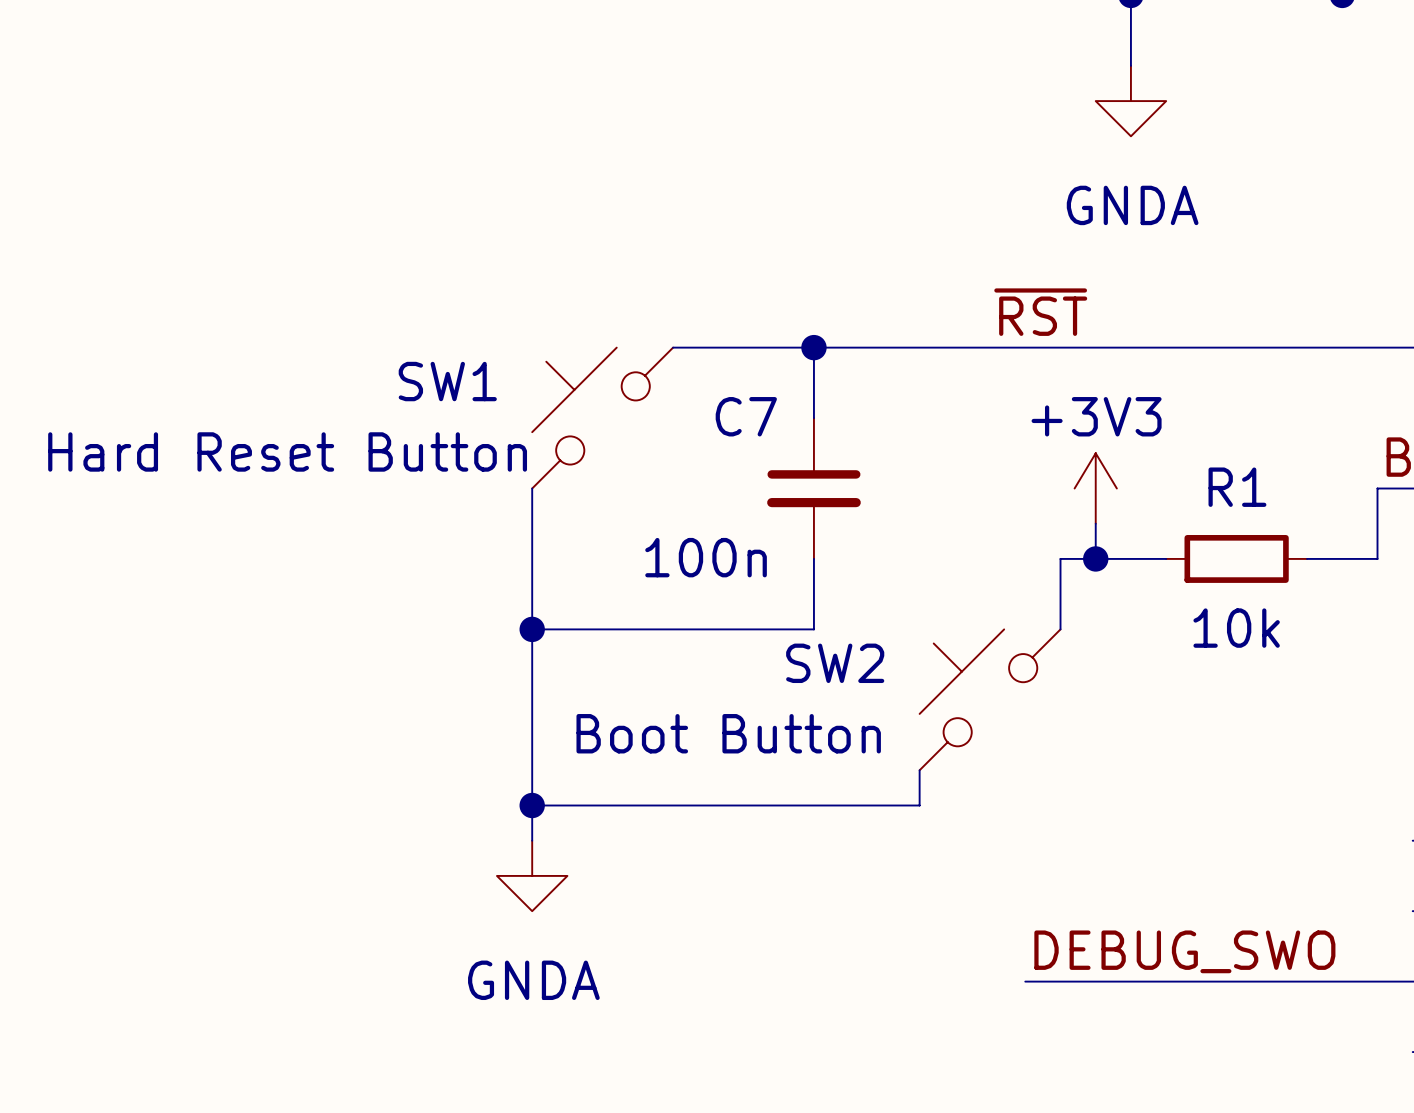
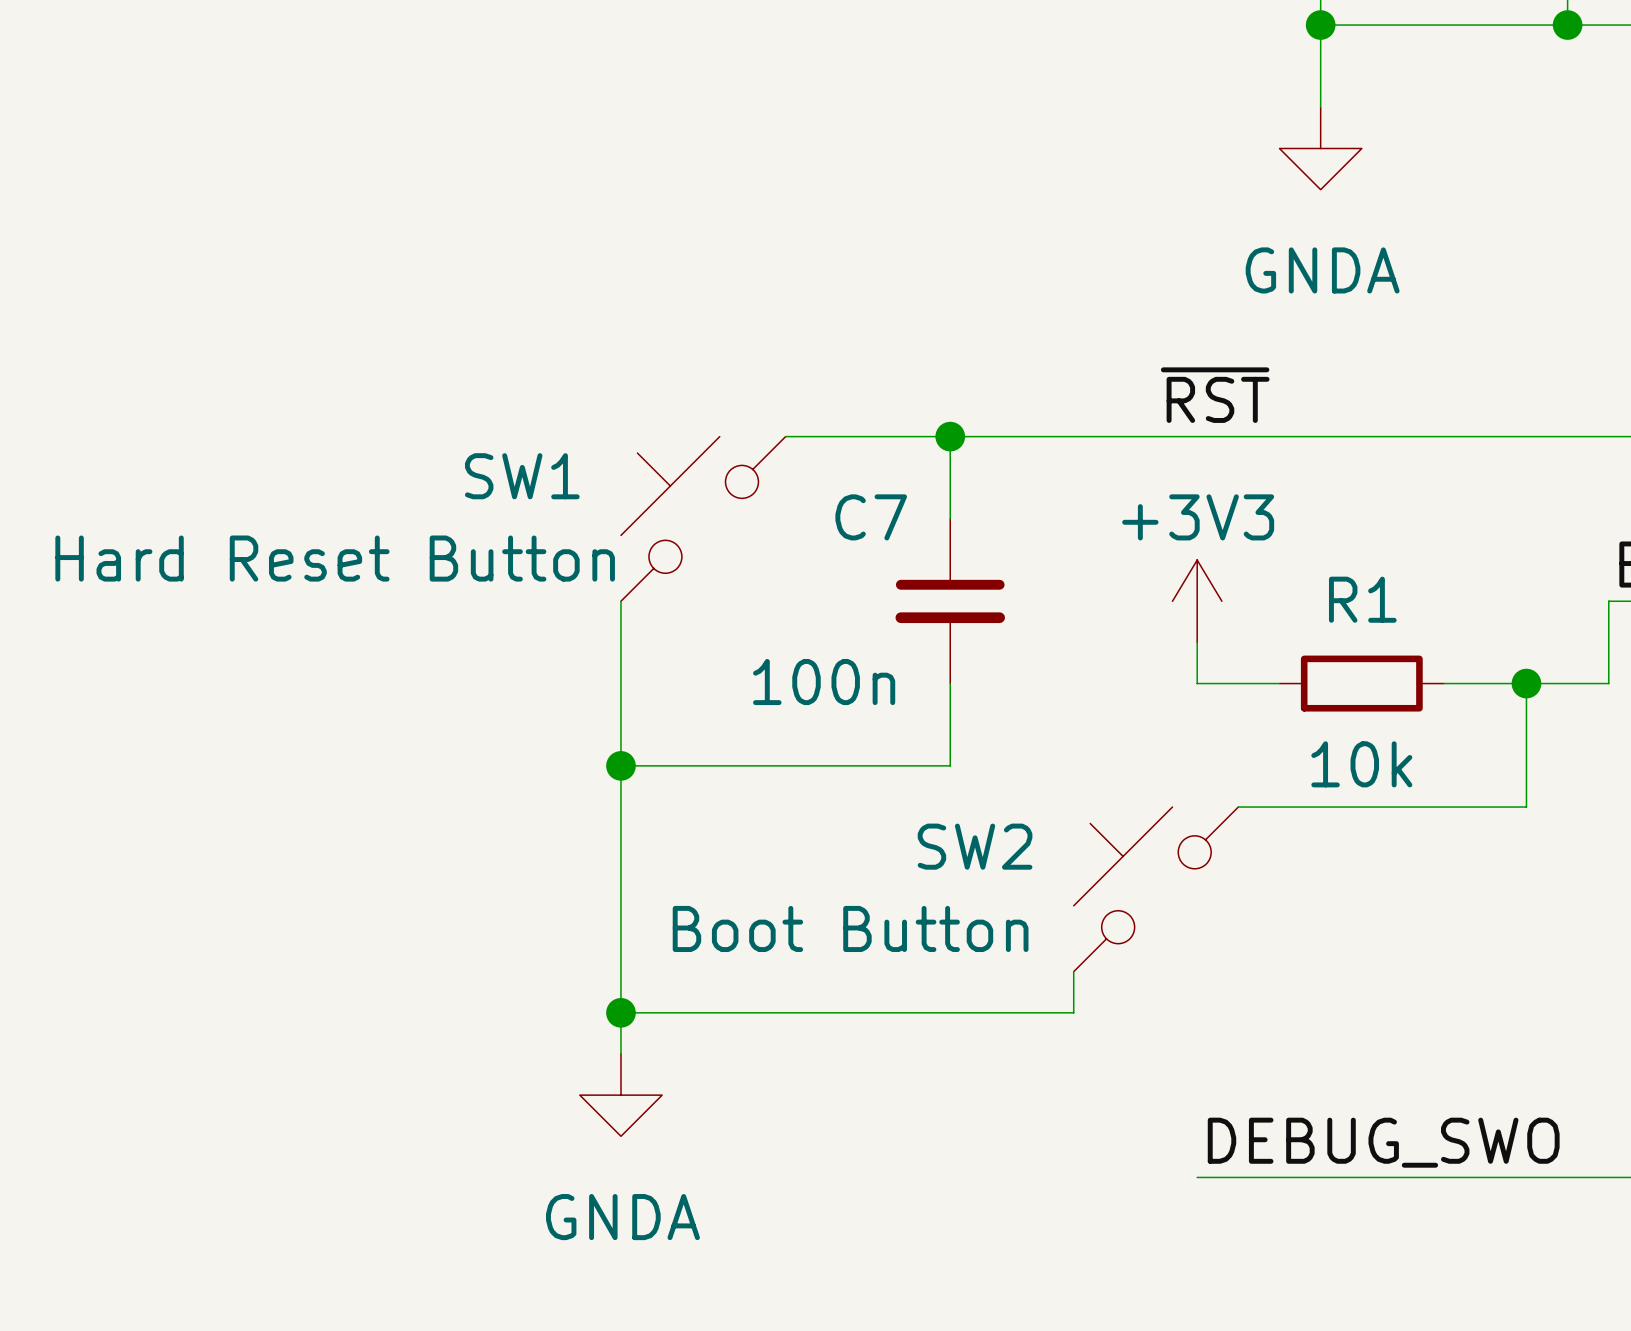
power symbol position: +3V3 (1095, 488) -> +3V3 (1197, 601)
wire: (1095, 523) (1095, 558) (1166, 558) -> none
wire: (1060, 558) (1060, 629) -> (1238, 683) (1197, 683) (1197, 642)
junction: (1095, 558) -> none
wire: none -> (1444, 683) (1526, 683) (1526, 807) (1238, 807)
R1 position: (1236, 558) -> (1361, 683)
junction: none -> (1526, 683)
SW2 position: (990, 699) -> (1156, 889)
wire: (919, 770) (919, 805) (532, 805) -> none
junction position: (532, 805) -> (620, 1012)
wire: none -> (1073, 971) (1073, 1012) (620, 1012) (620, 1053)
power symbol position: GNDA (532, 875) -> GNDA (620, 1095)

